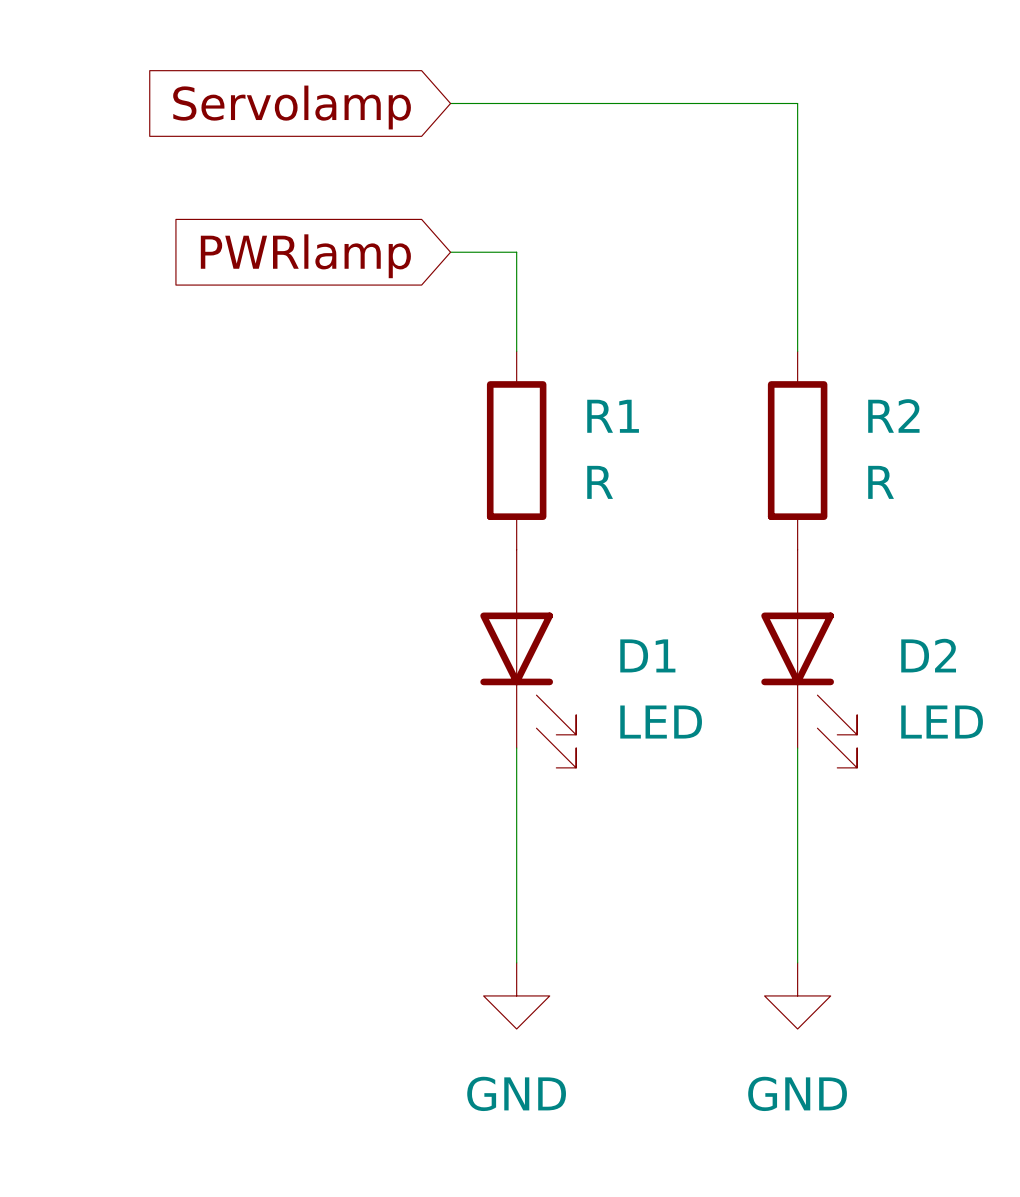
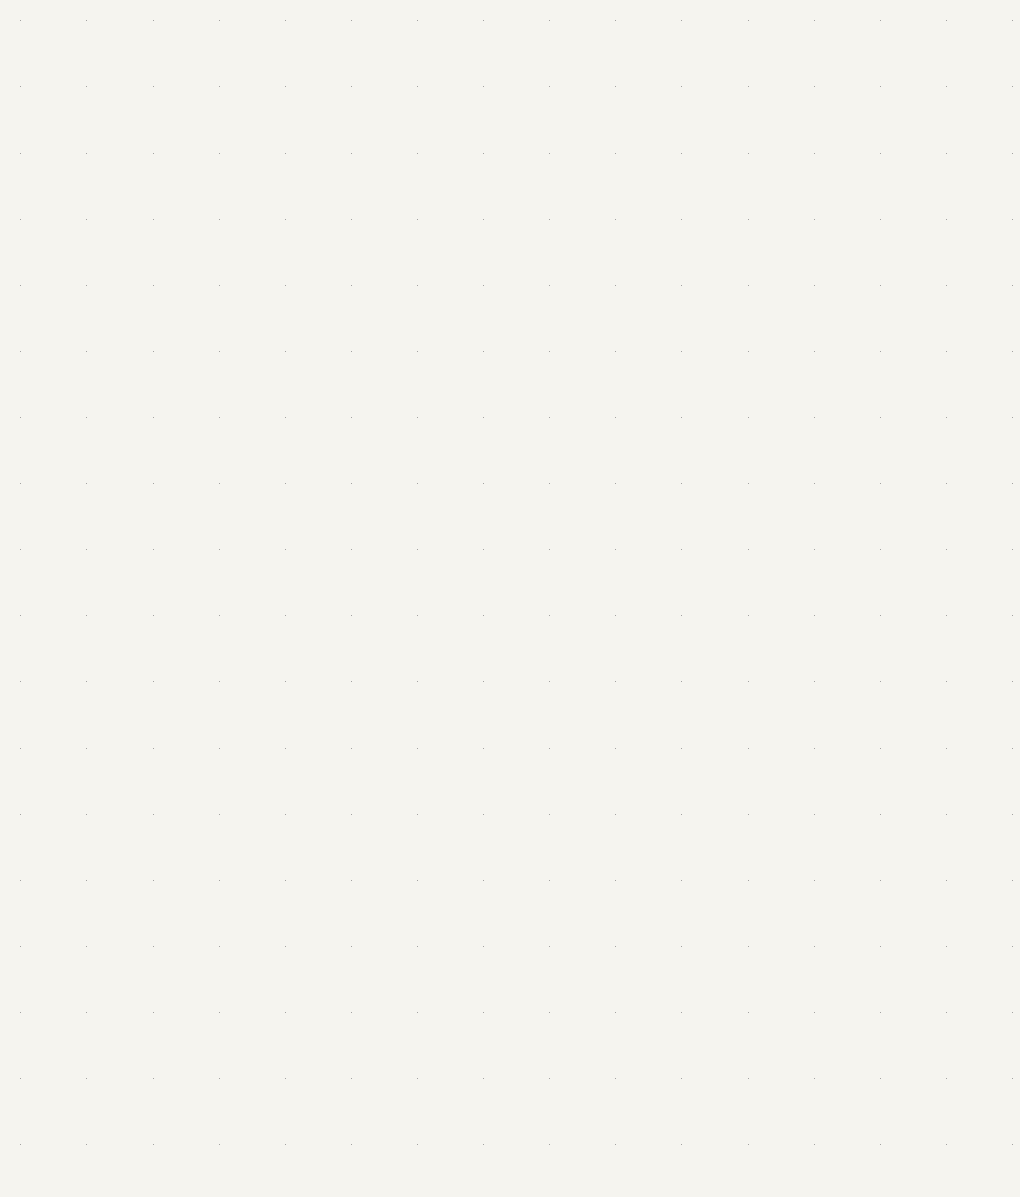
wire: (450, 103) (797, 103) (797, 351) -> none
global label: Servolamp (292, 107) -> none
wire: (450, 252) (516, 252) (516, 351) -> none
global label: PWRlamp (305, 256) -> none
R1: R (516, 450) -> none
R2: R (797, 450) -> none
D1: LED (528, 658) -> none
D2: LED (809, 658) -> none
wire: (516, 748) (516, 962) -> none
wire: (797, 748) (797, 962) -> none
power symbol: GND (516, 995) -> none
power symbol: GND (797, 995) -> none

